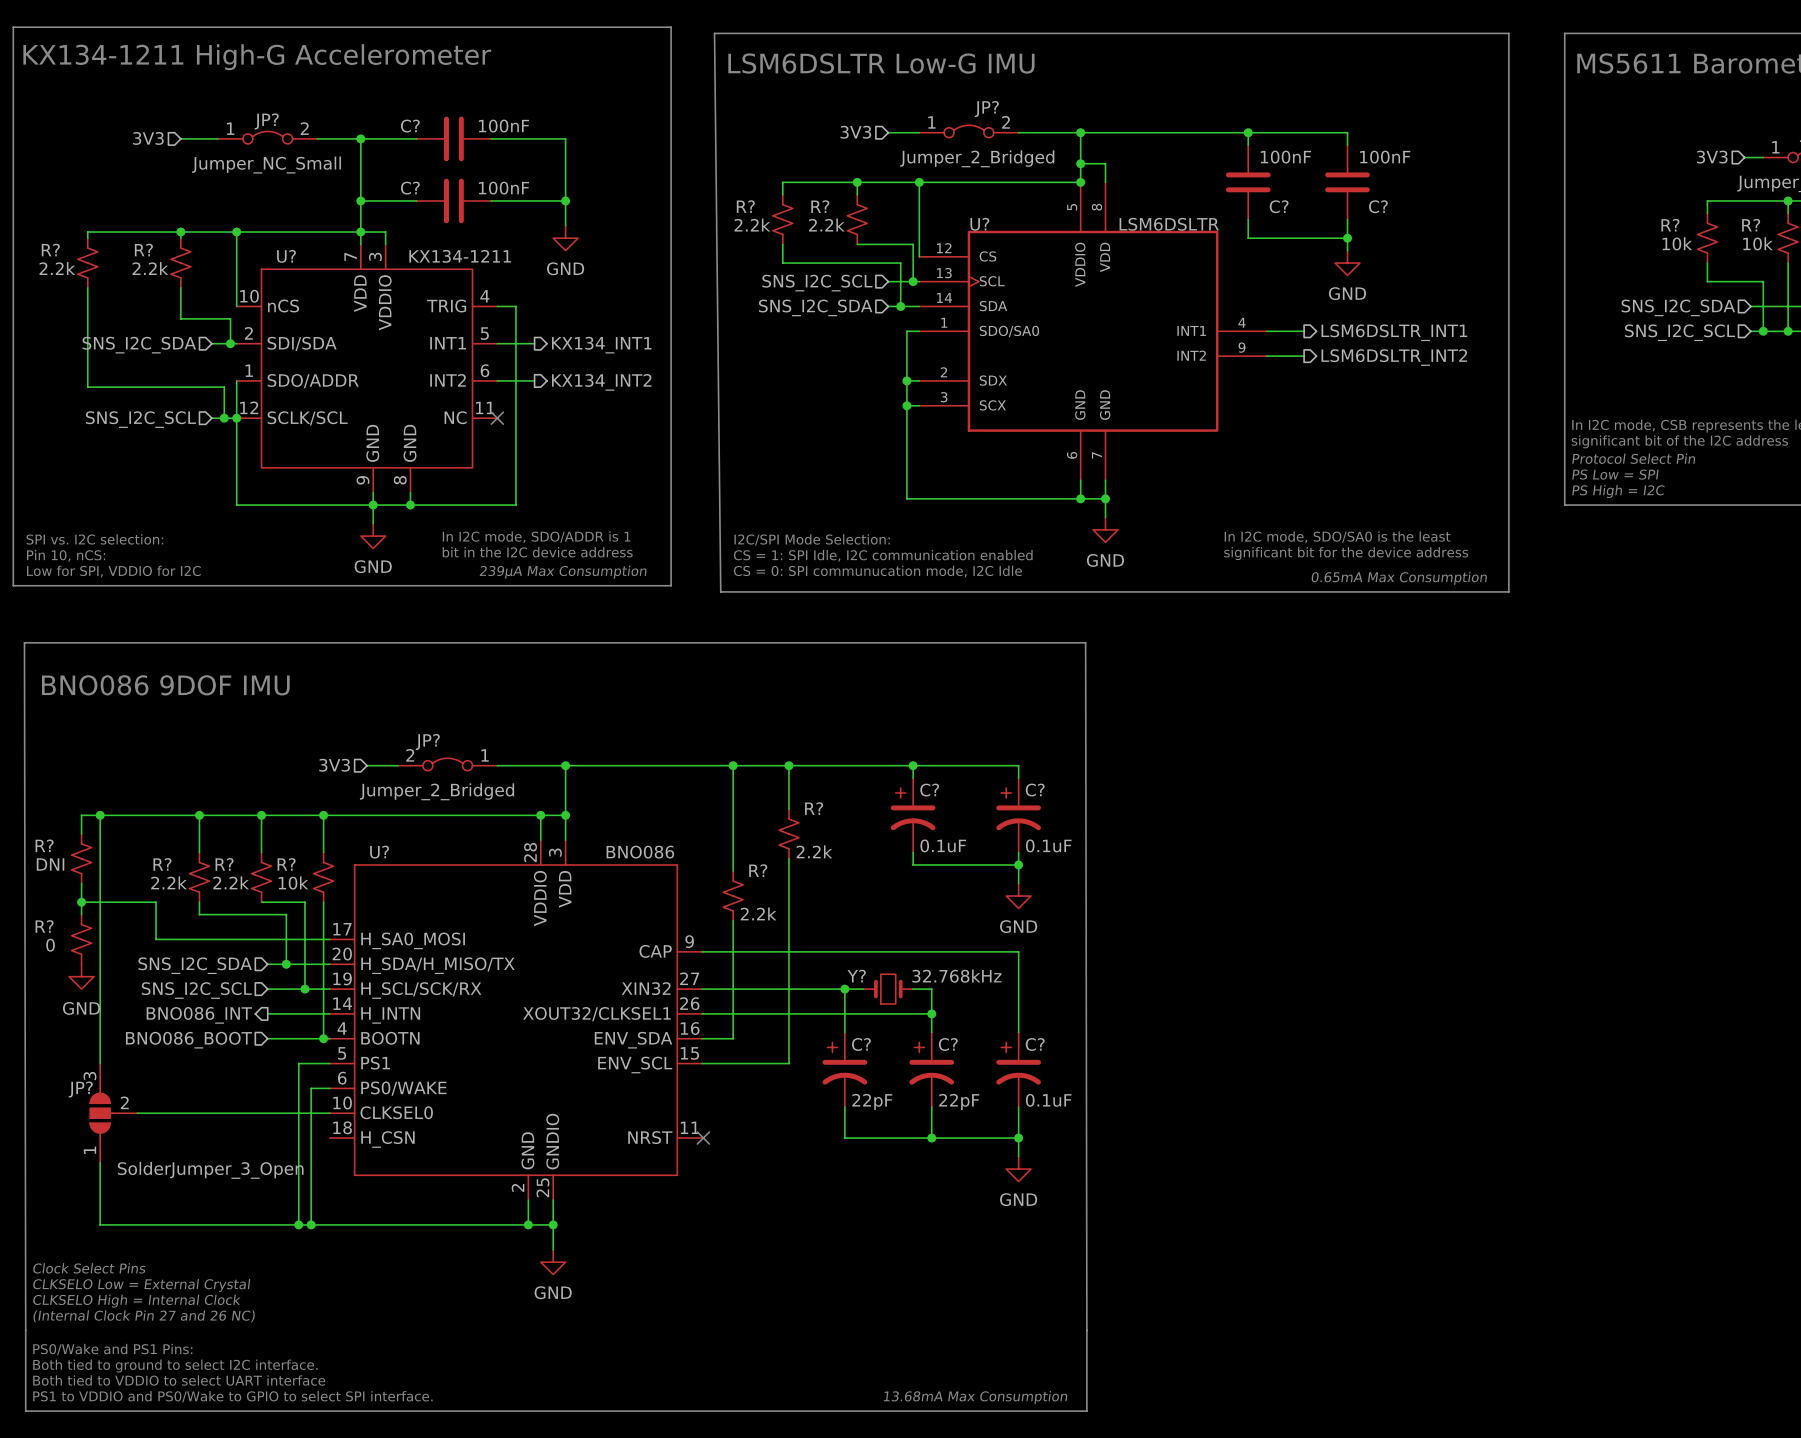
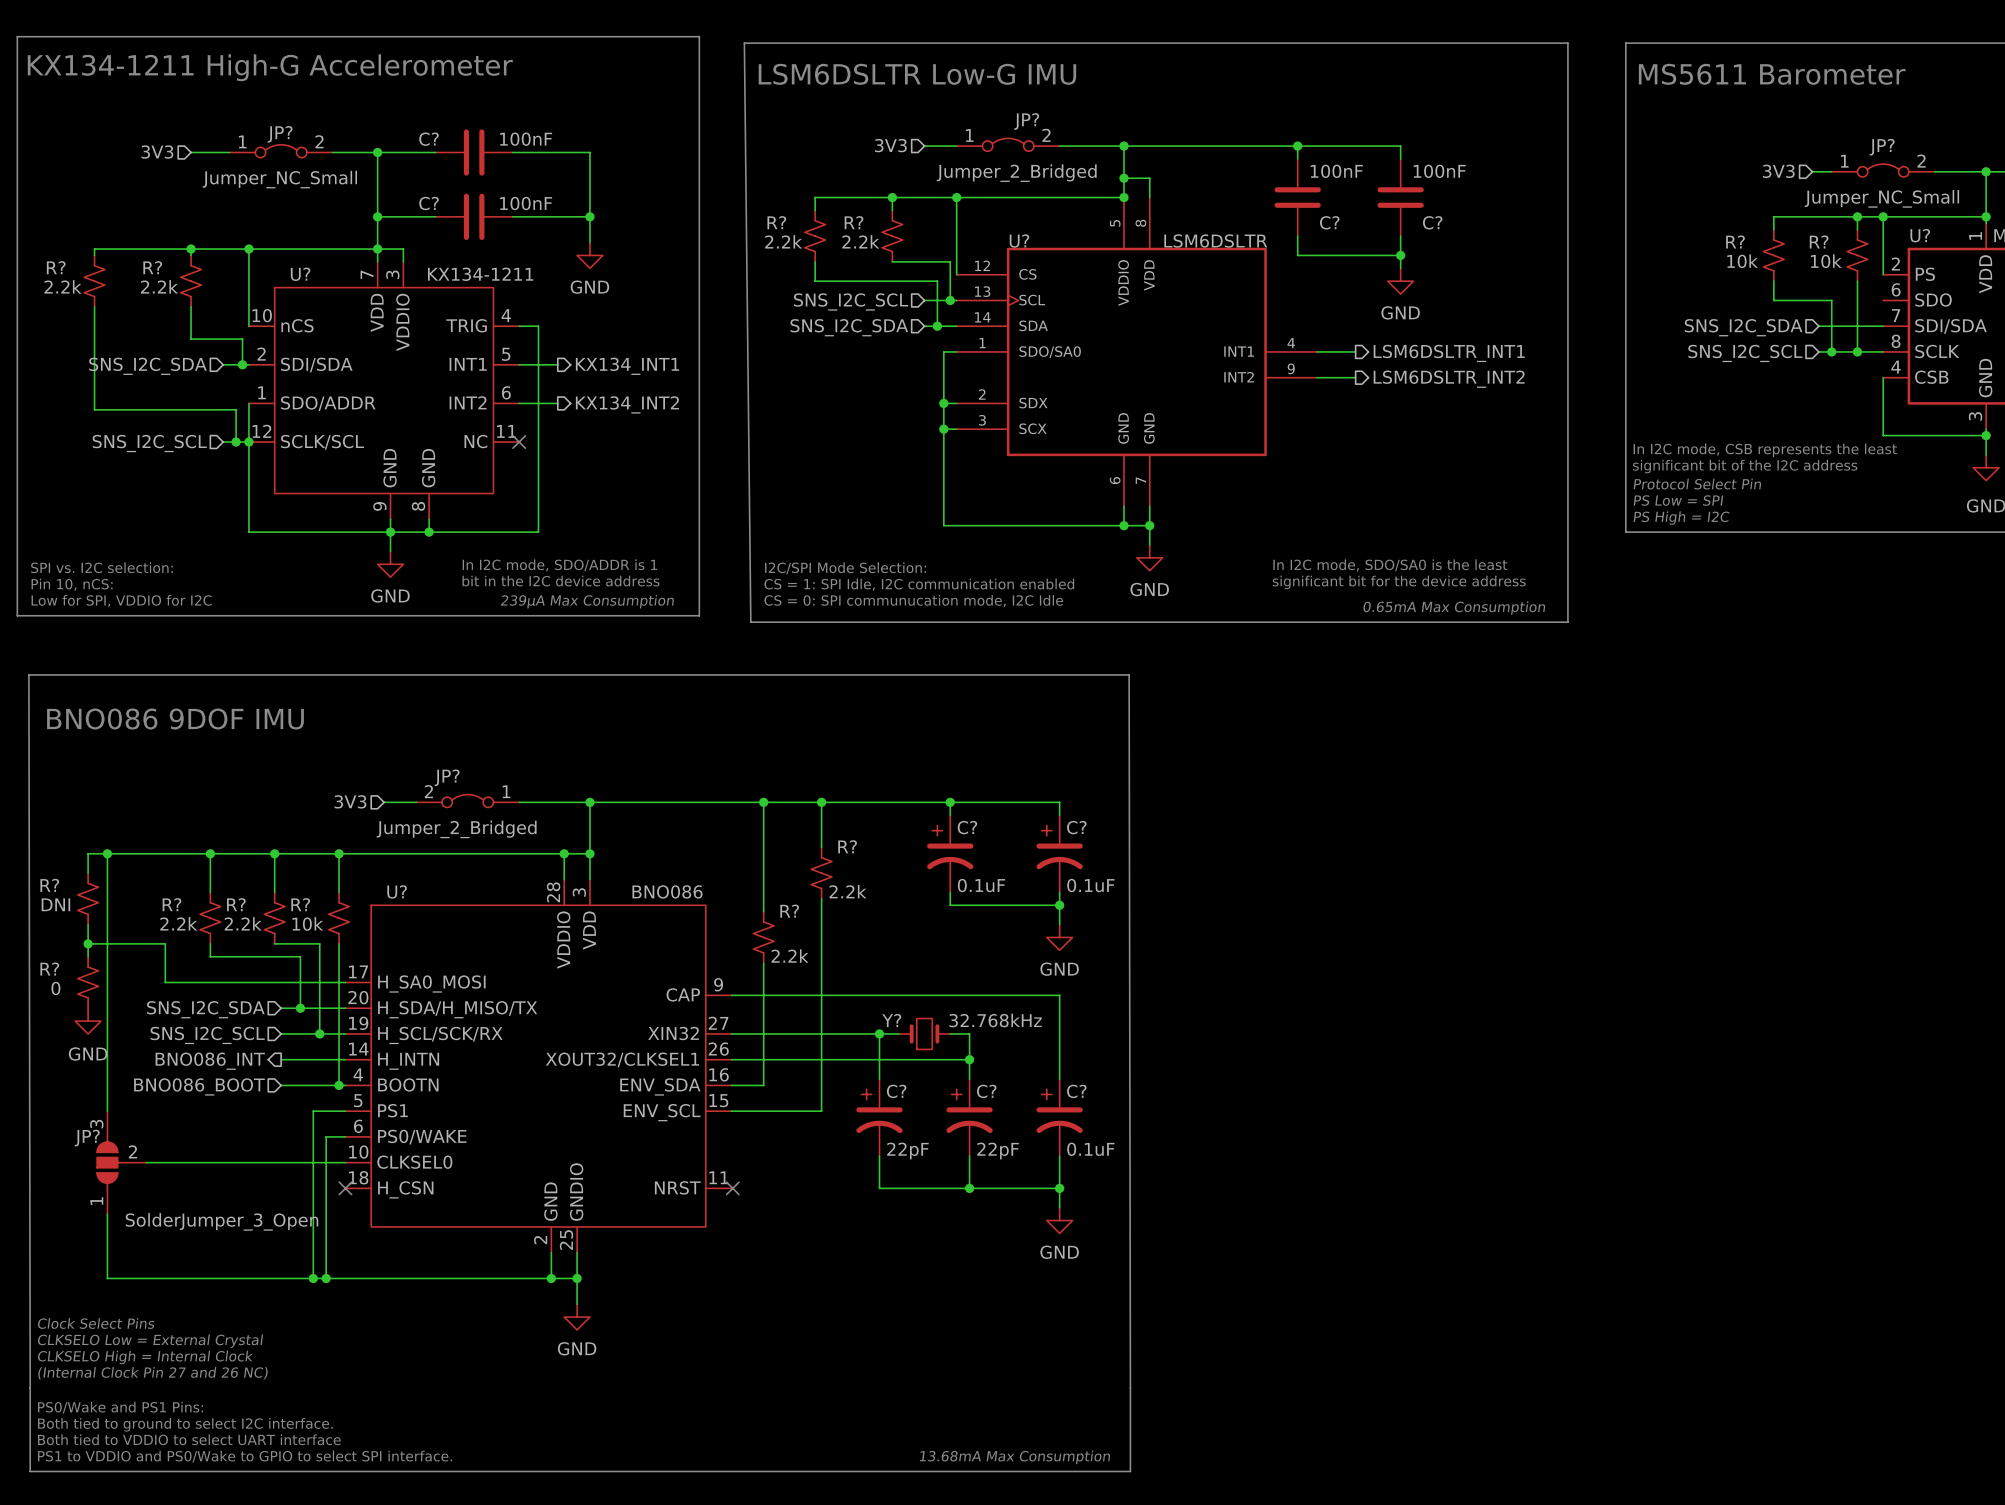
no-connect mark: none -> (345, 1188)

